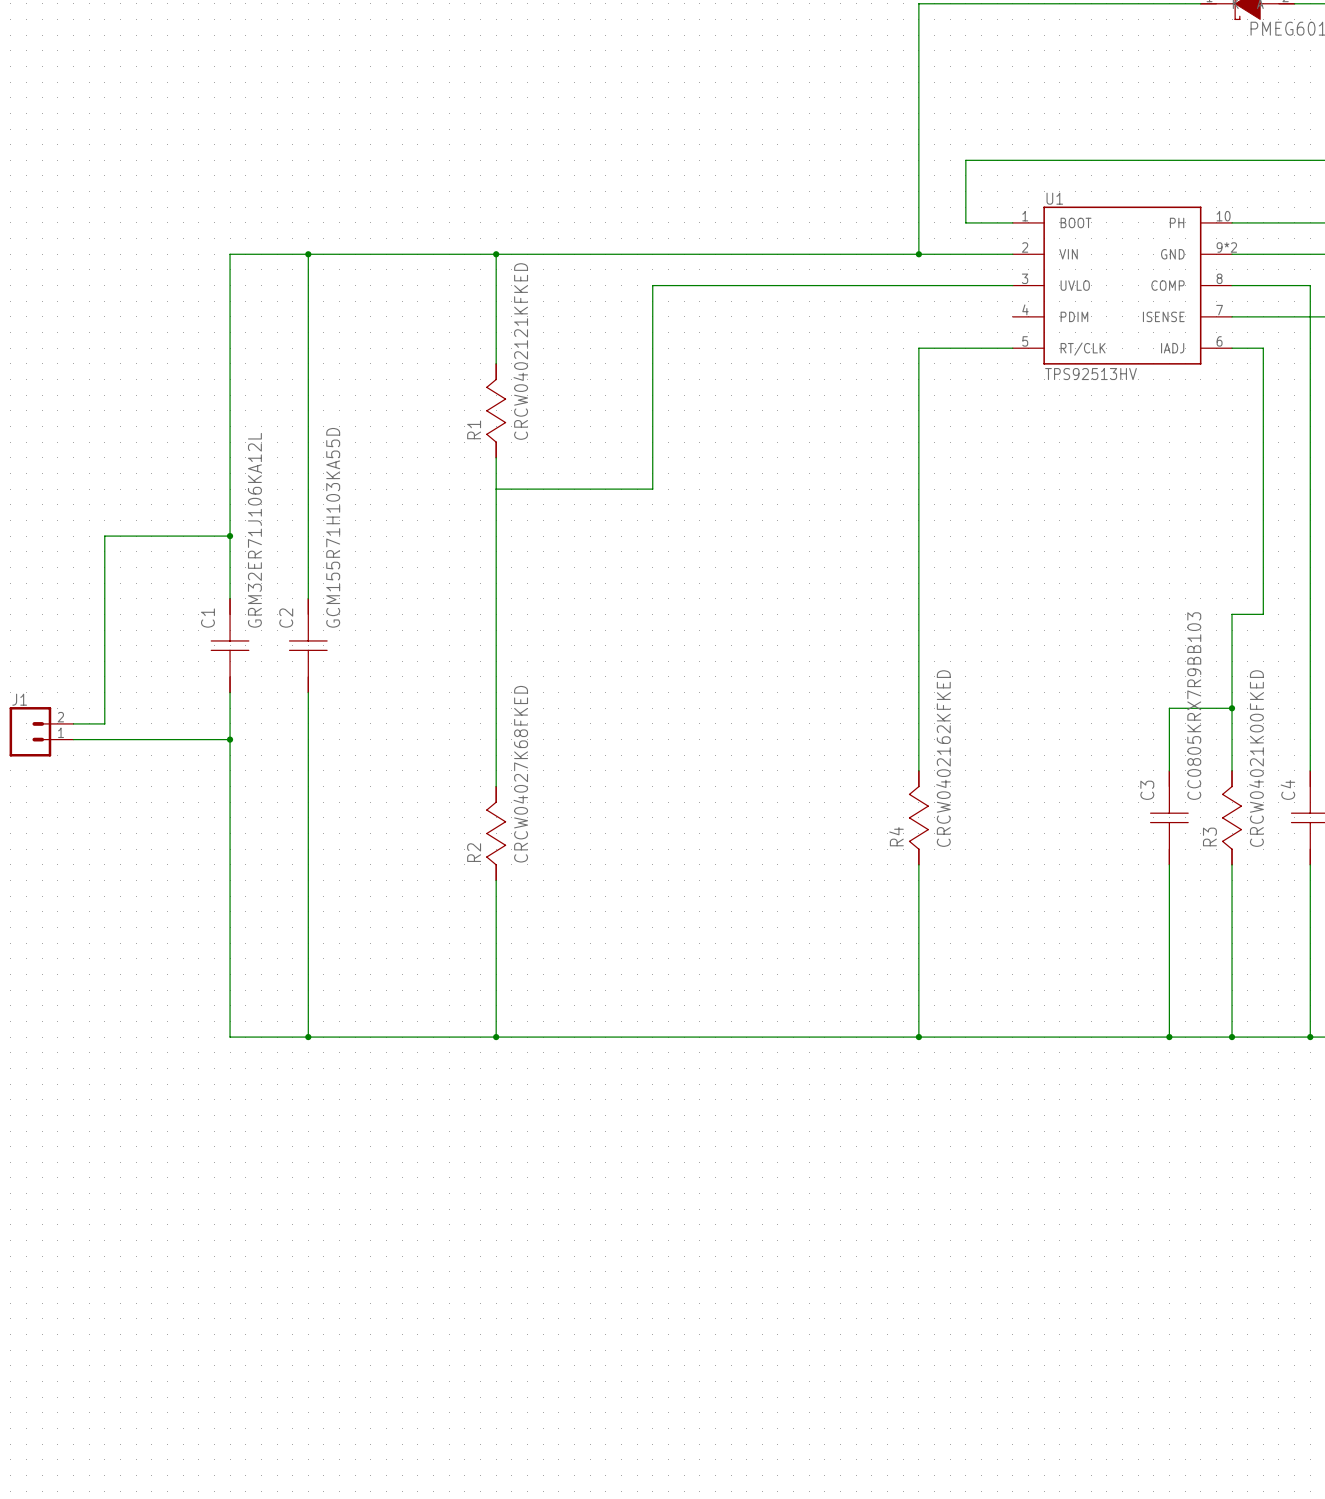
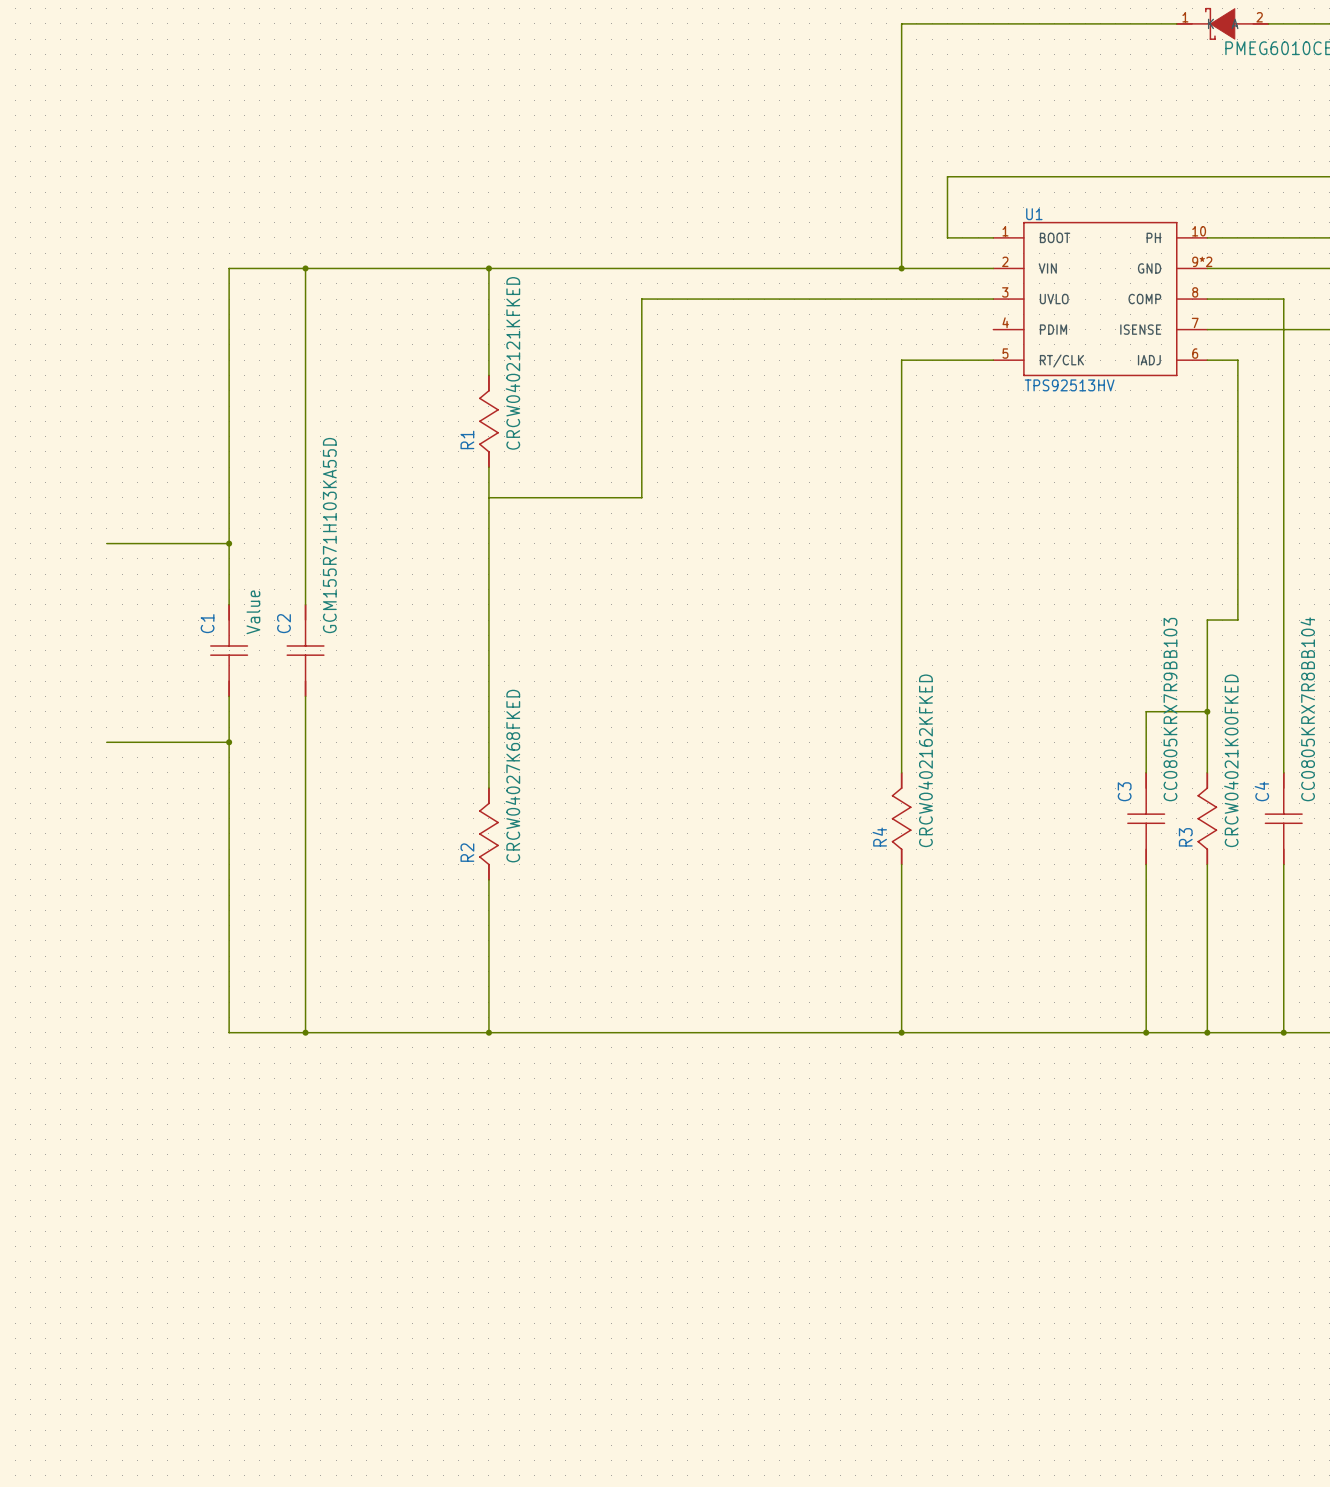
C1 value: GRM32ER71J106KA12L (254, 530) -> Value (253, 612)
wire: (104, 536) (104, 723) (73, 723) -> none
J1: (41, 731) -> none
wire: (73, 739) (104, 739) -> none

